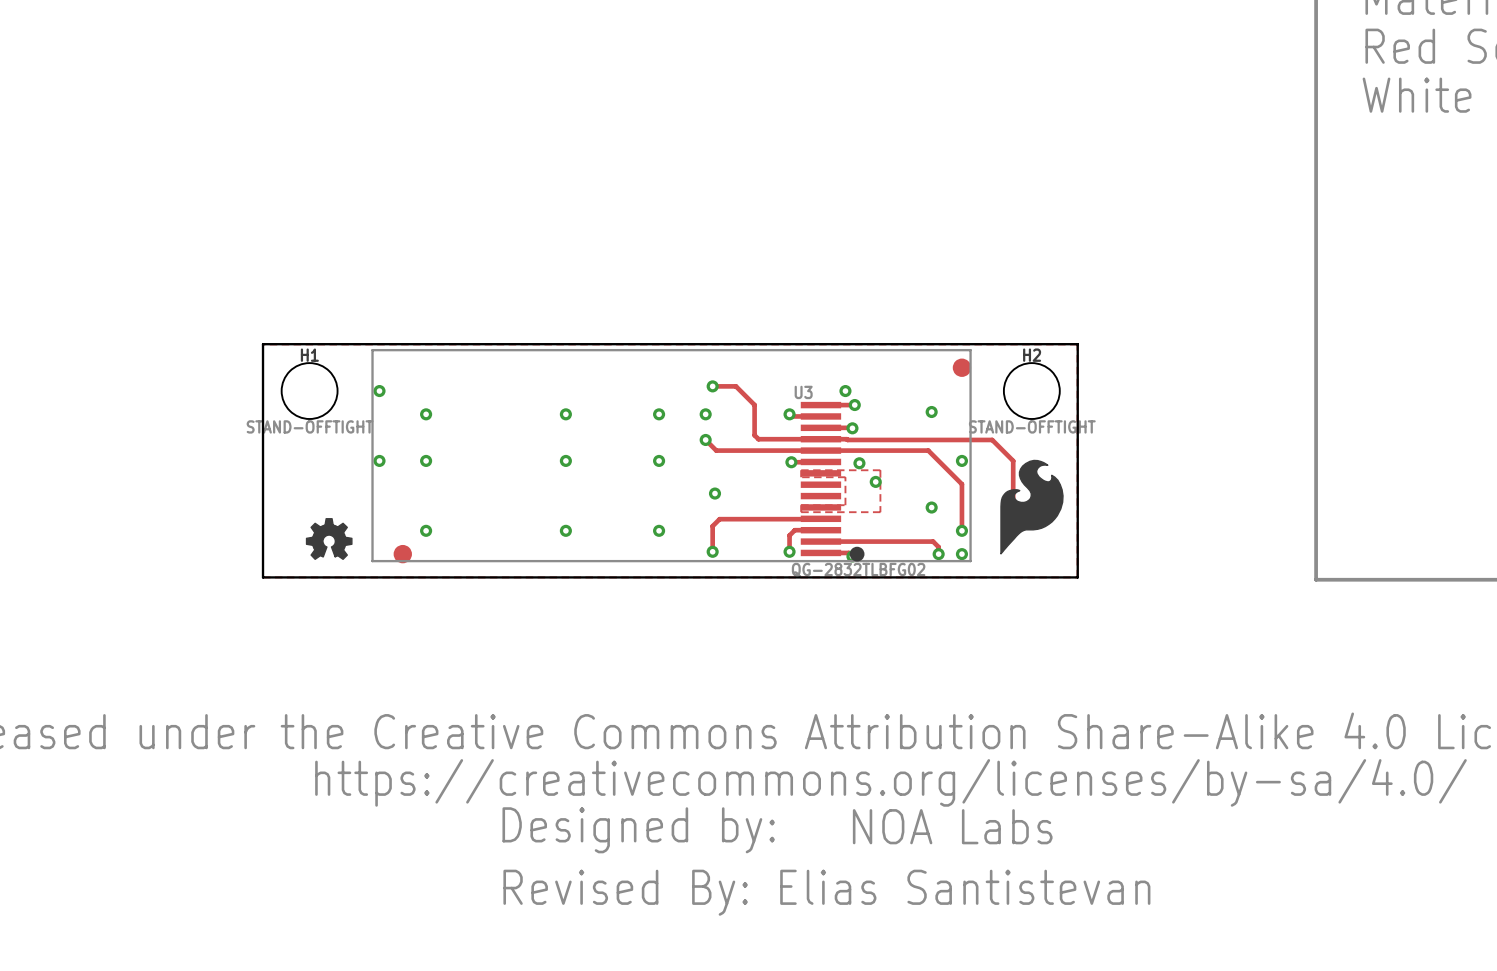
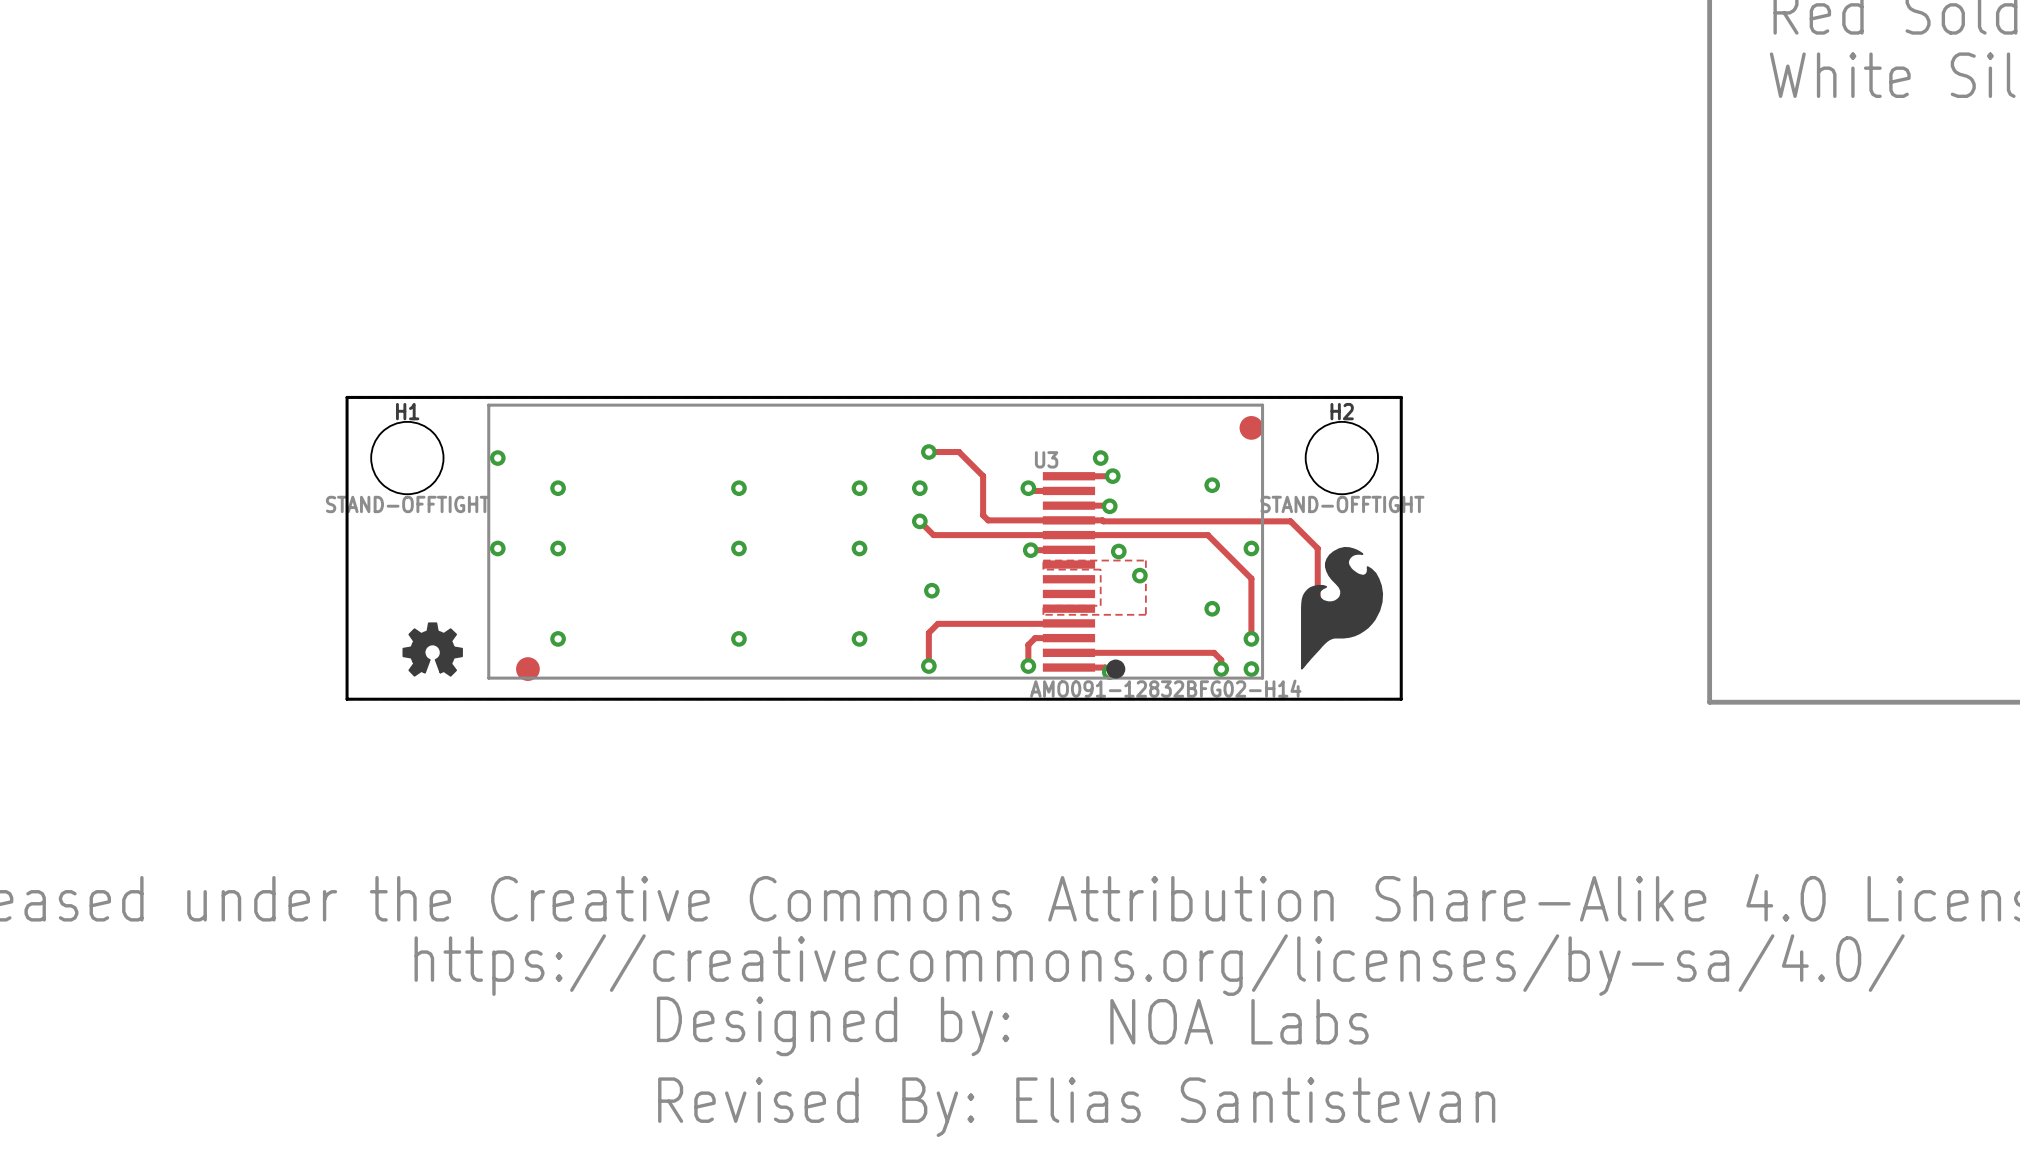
U3 value: QG-2832TLBFG02 (858, 570) -> AMO091-12832BFG02-H14 (1165, 688)

